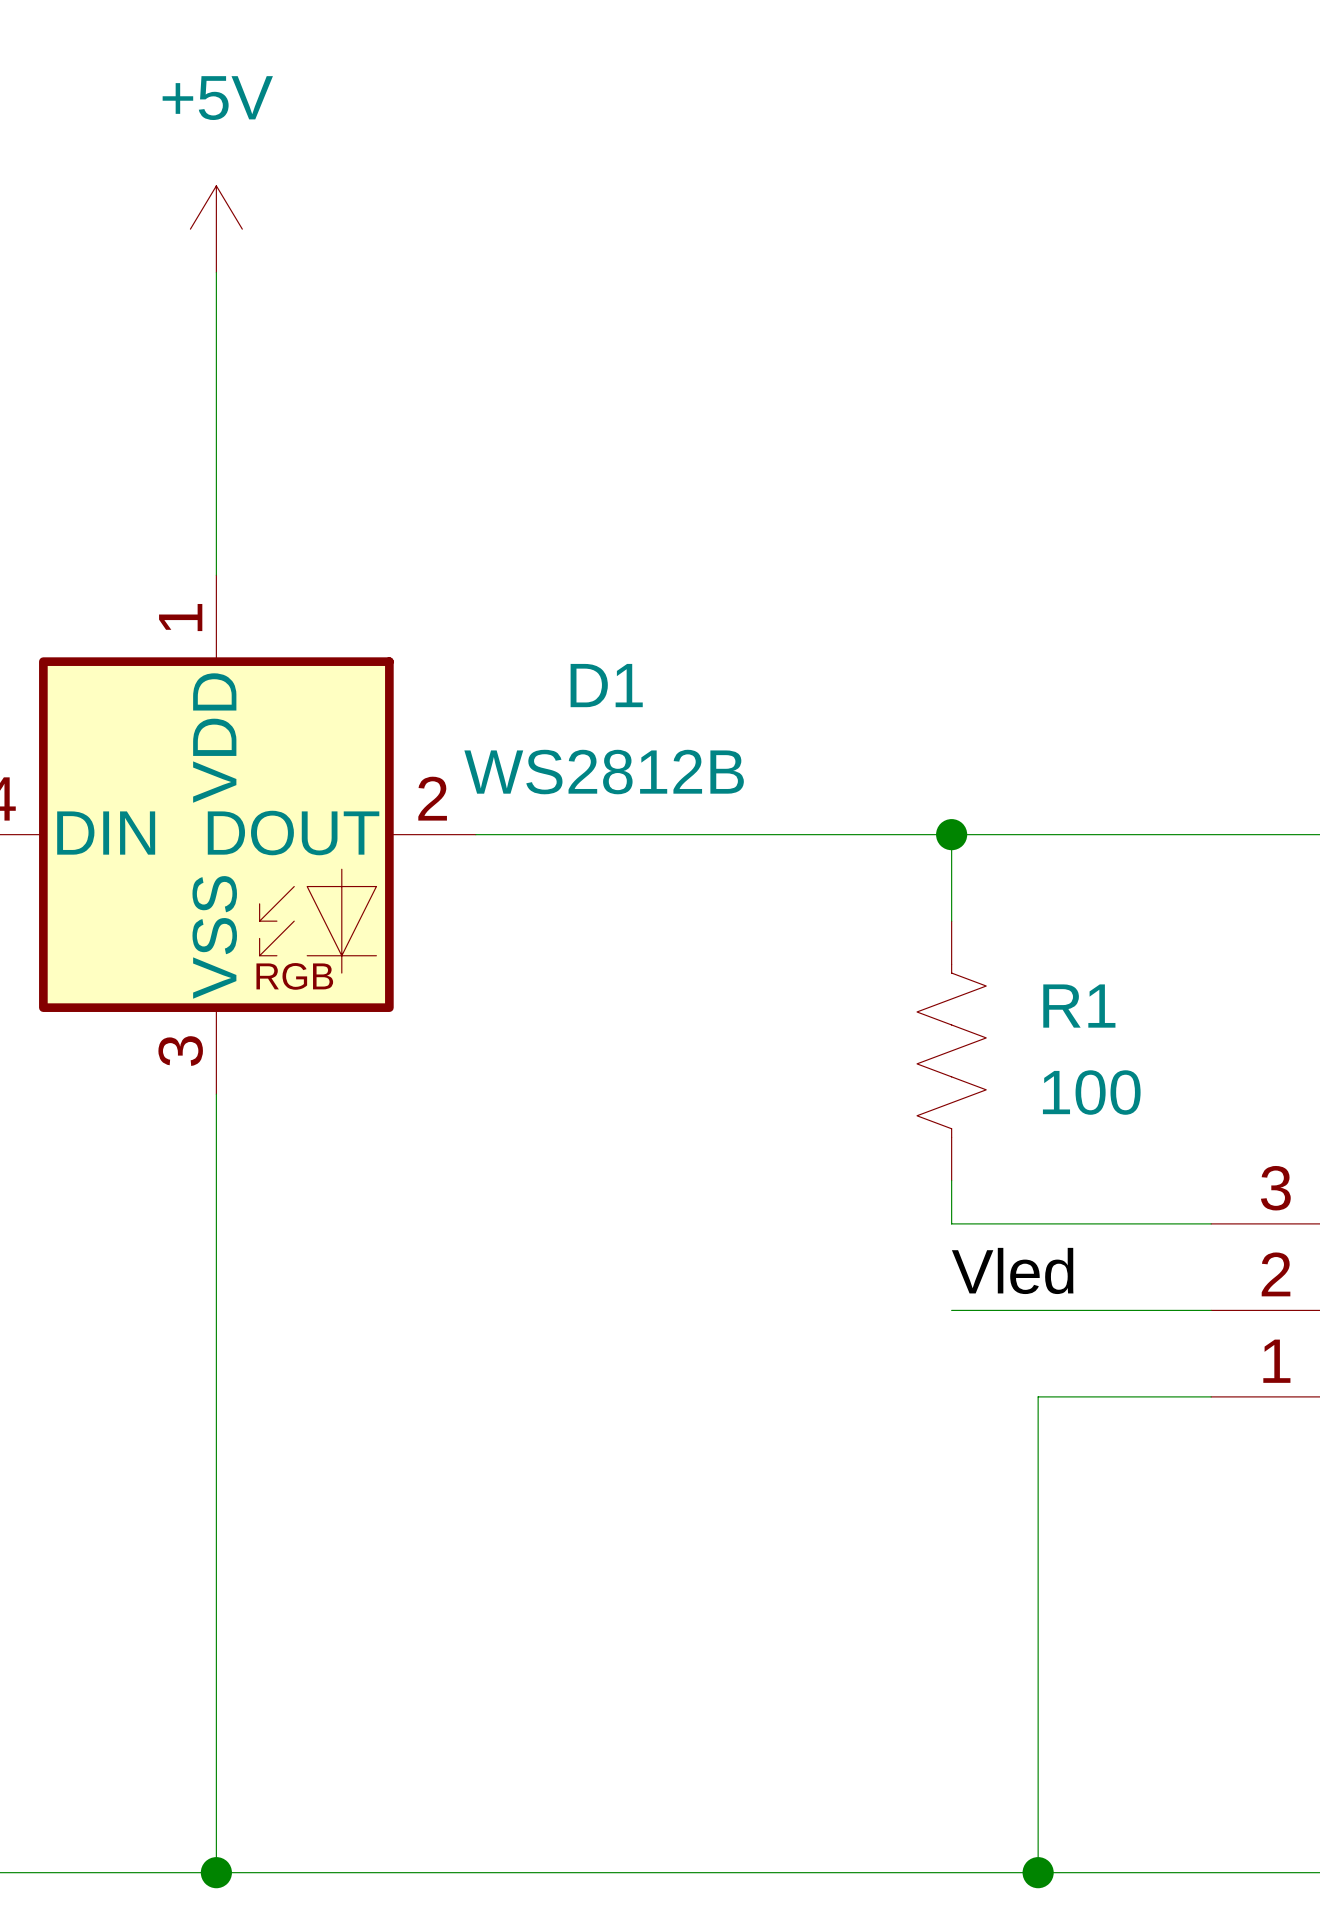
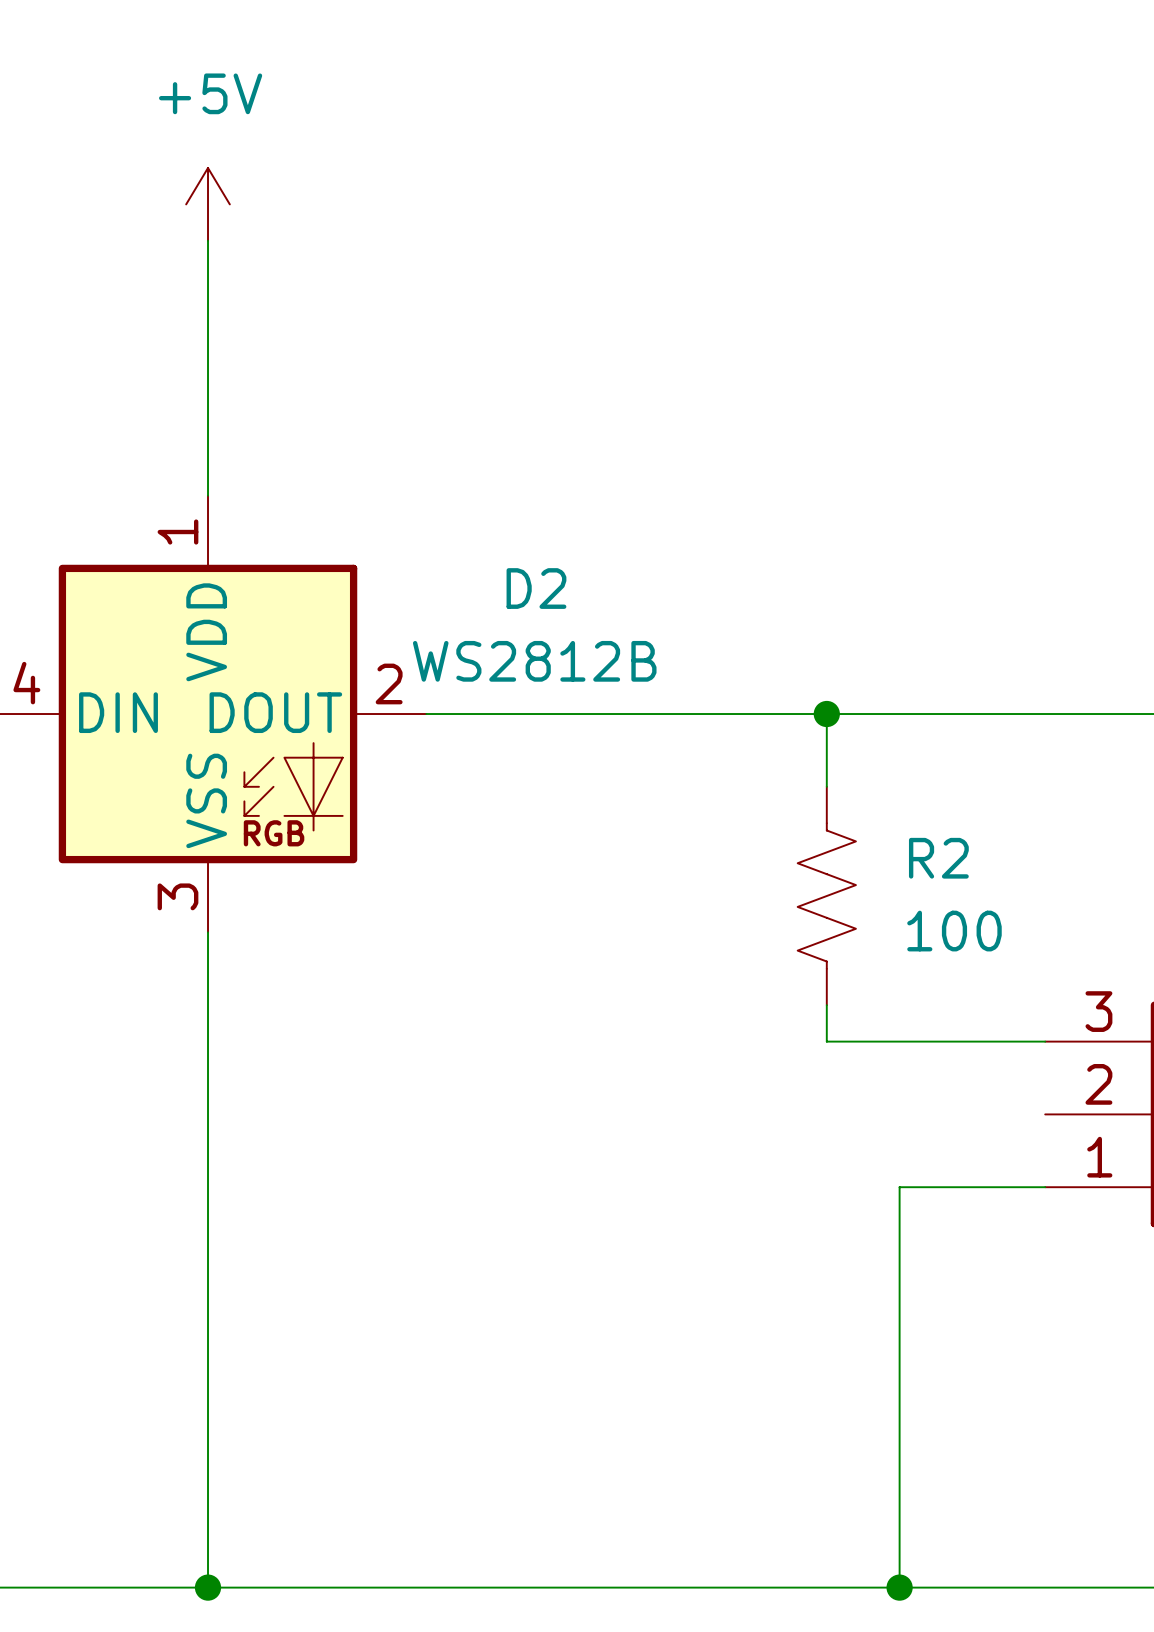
D1 name: D1 (606, 685) -> D2 (536, 588)
R1 name: R1 (1079, 1006) -> R2 (938, 858)
label: Vled (1012, 1270) -> none
wire: (951, 1310) (1211, 1310) -> none

